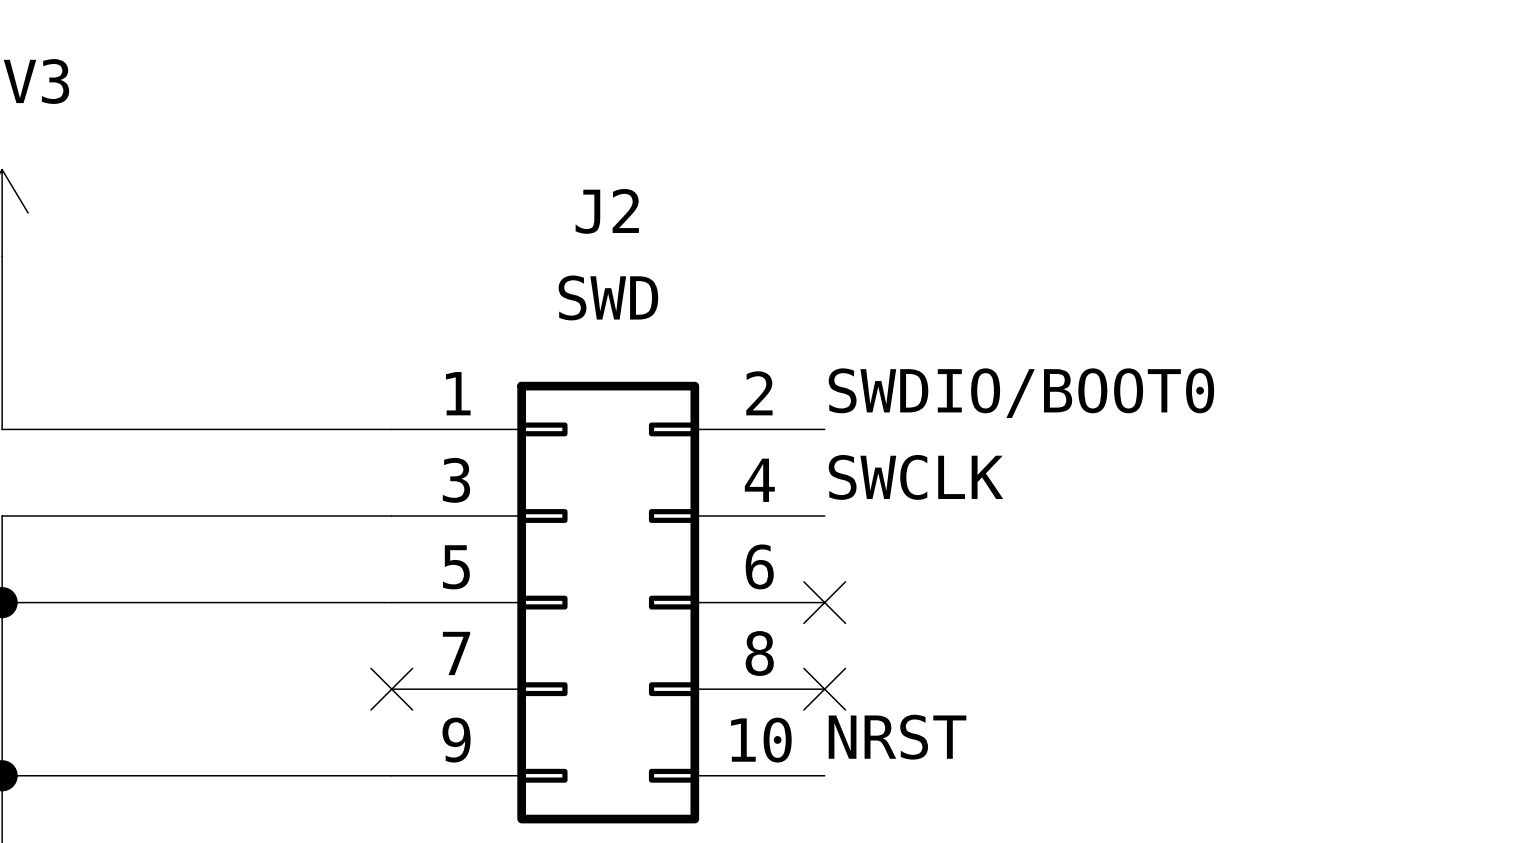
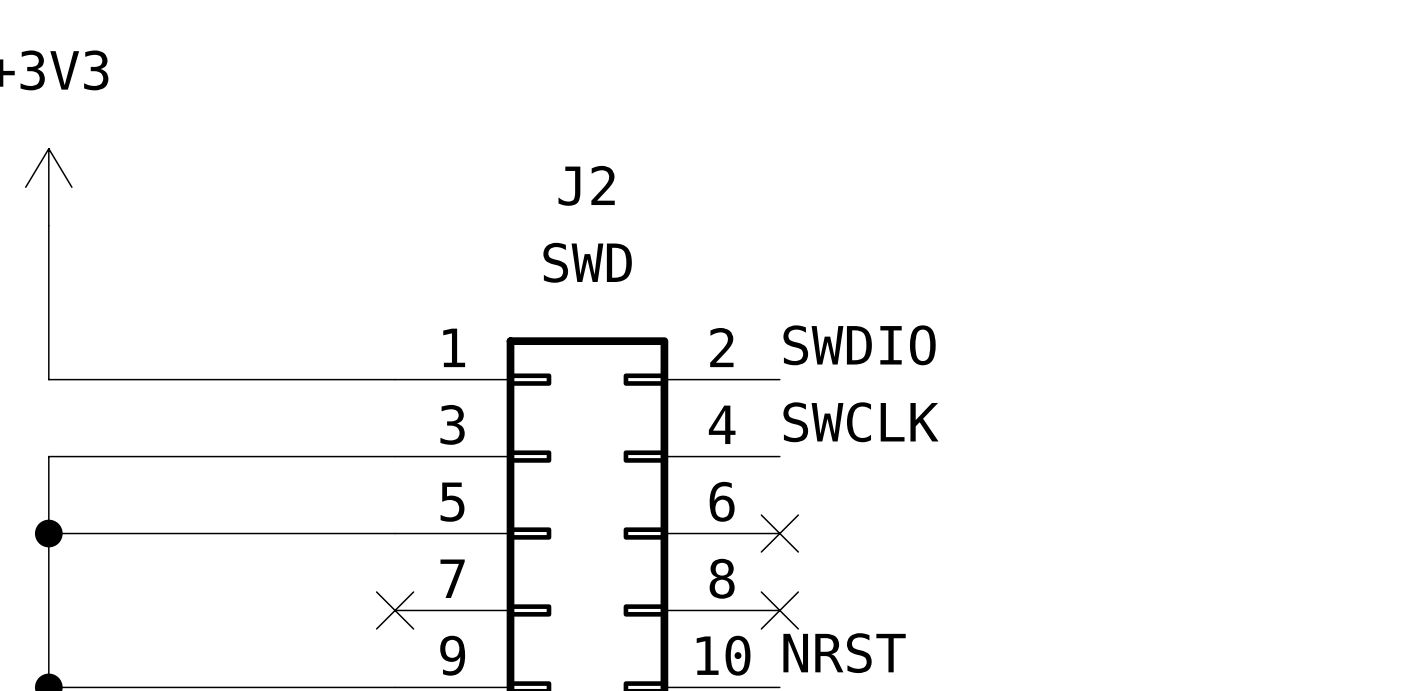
label: SWDIO/BOOT0 (1021, 393) -> SWDIO (859, 345)

